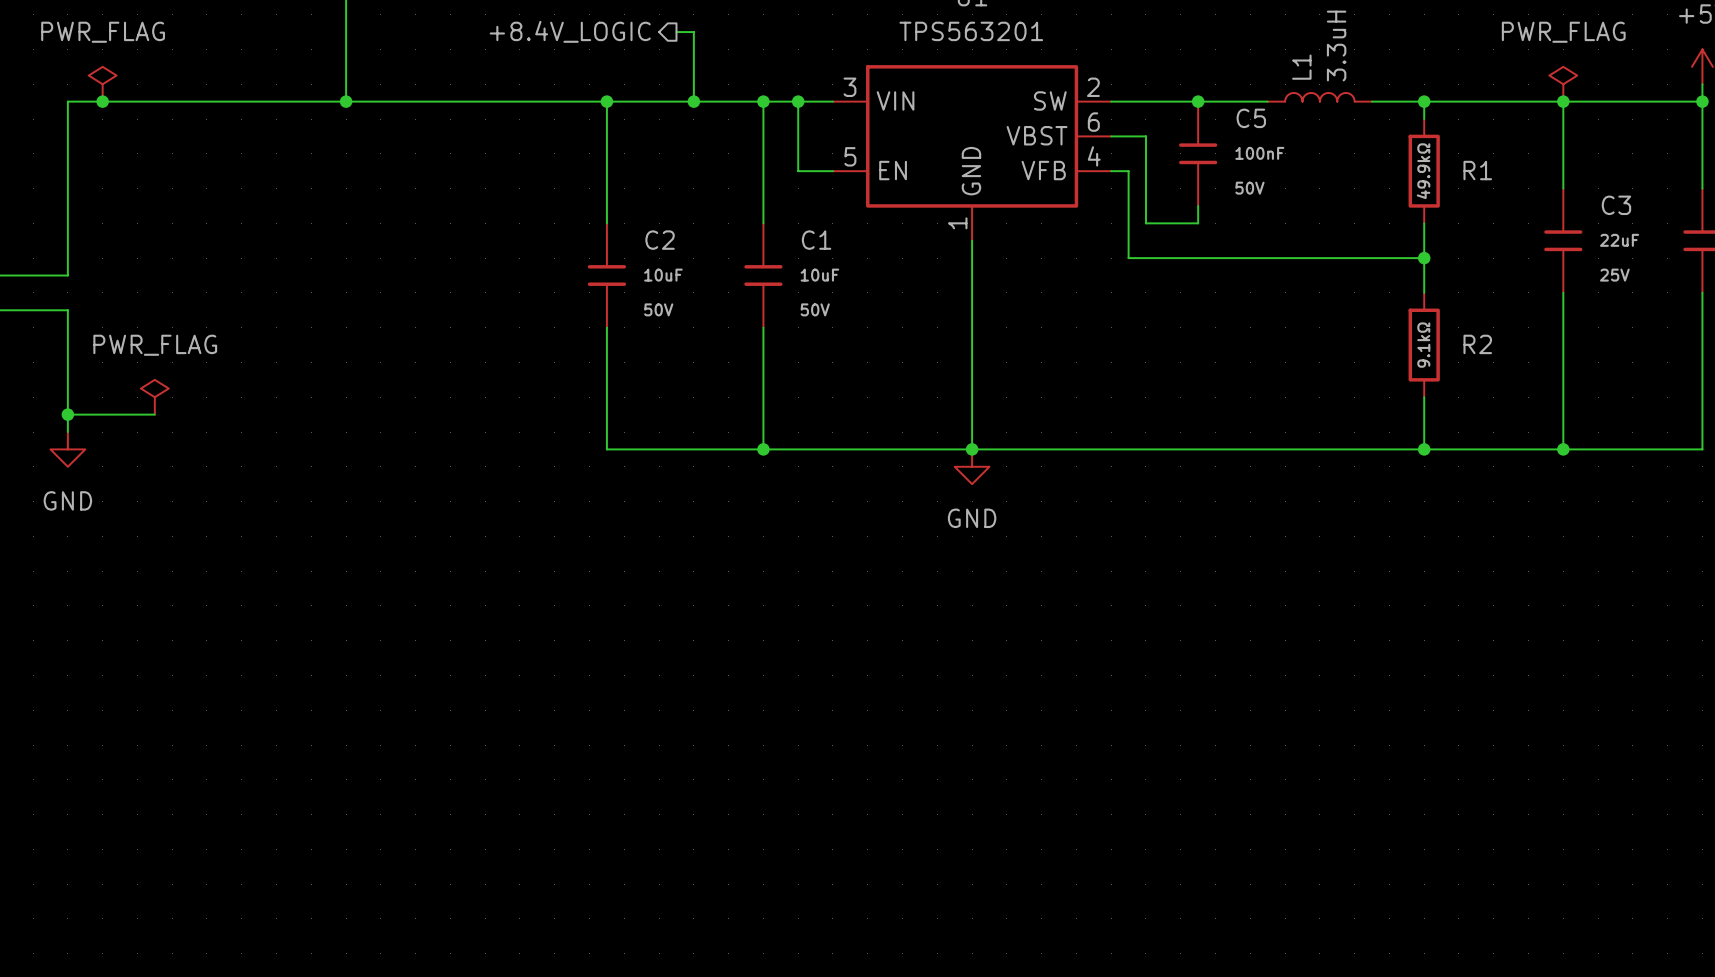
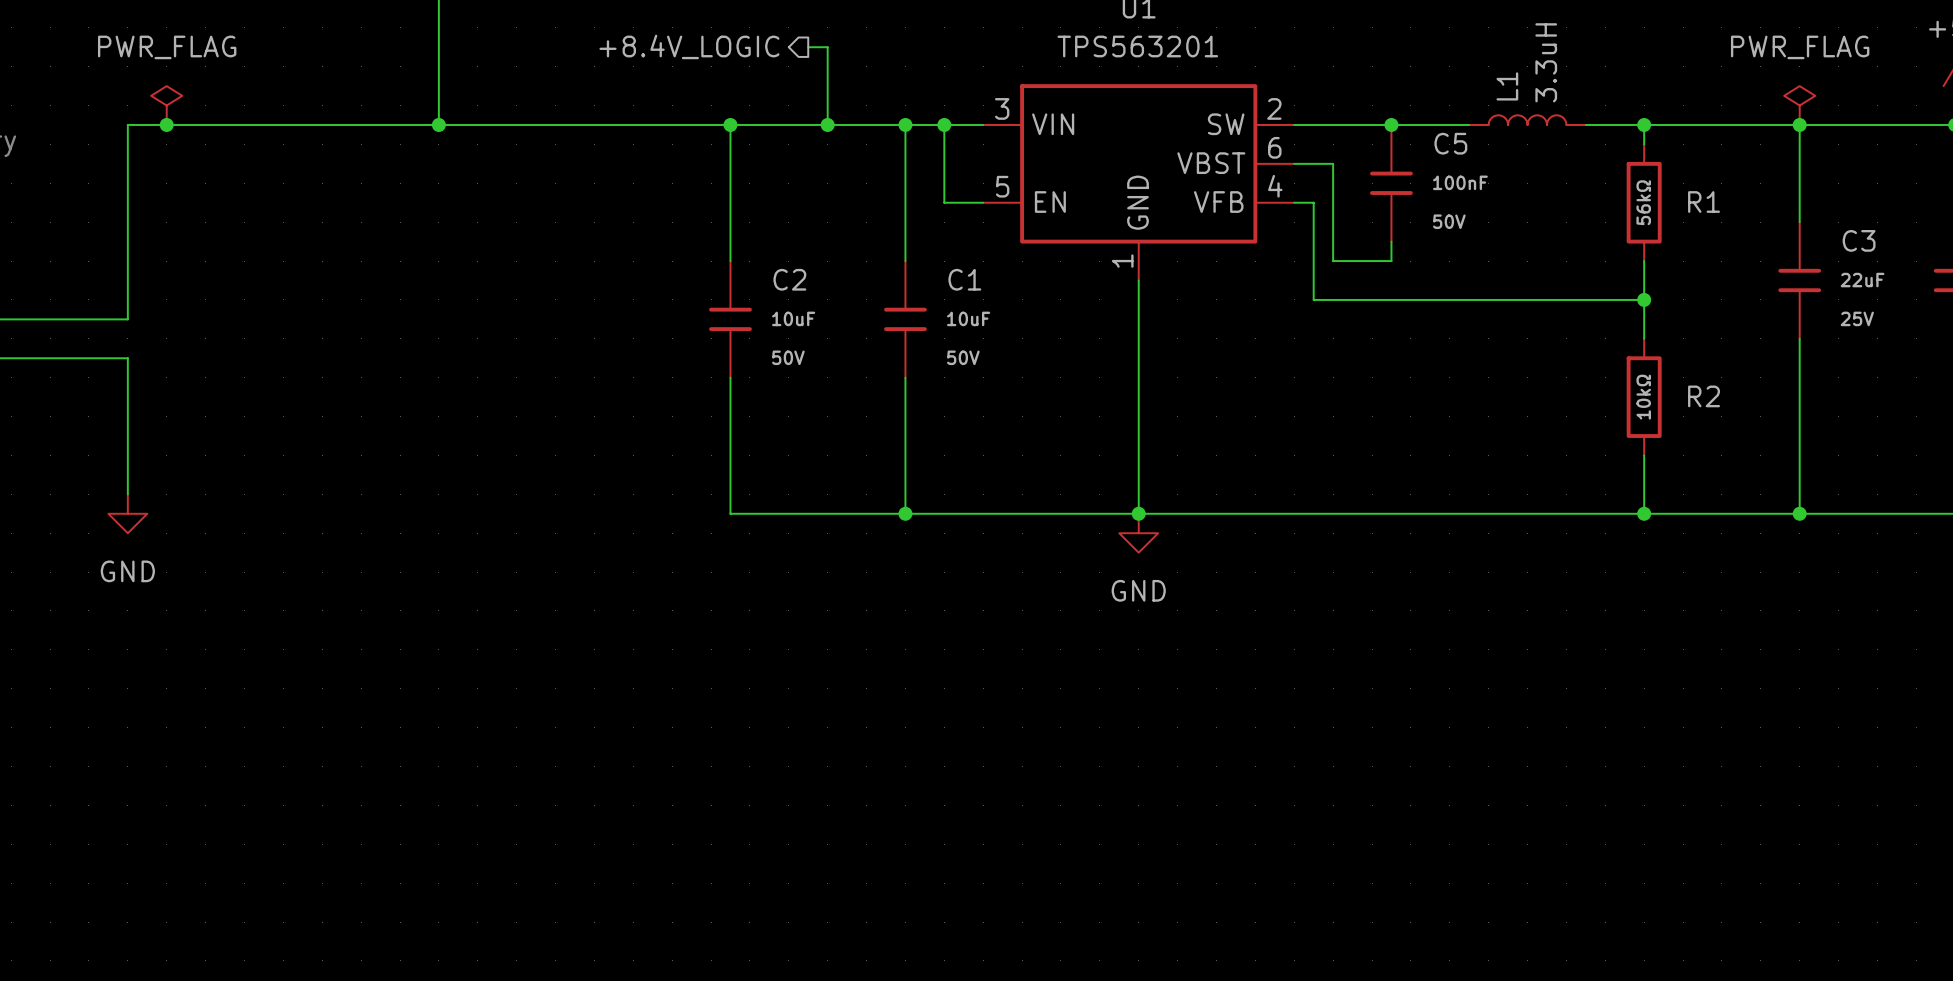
R1 value: 49.9kΩ (1423, 171) -> 56kΩ (1643, 202)
R2 value: 9.1kΩ (1423, 345) -> 10kΩ (1643, 397)
power symbol: PWR_FLAG (154, 397) -> none
wire: (67, 414) (154, 414) -> none
junction: (67, 414) -> none

